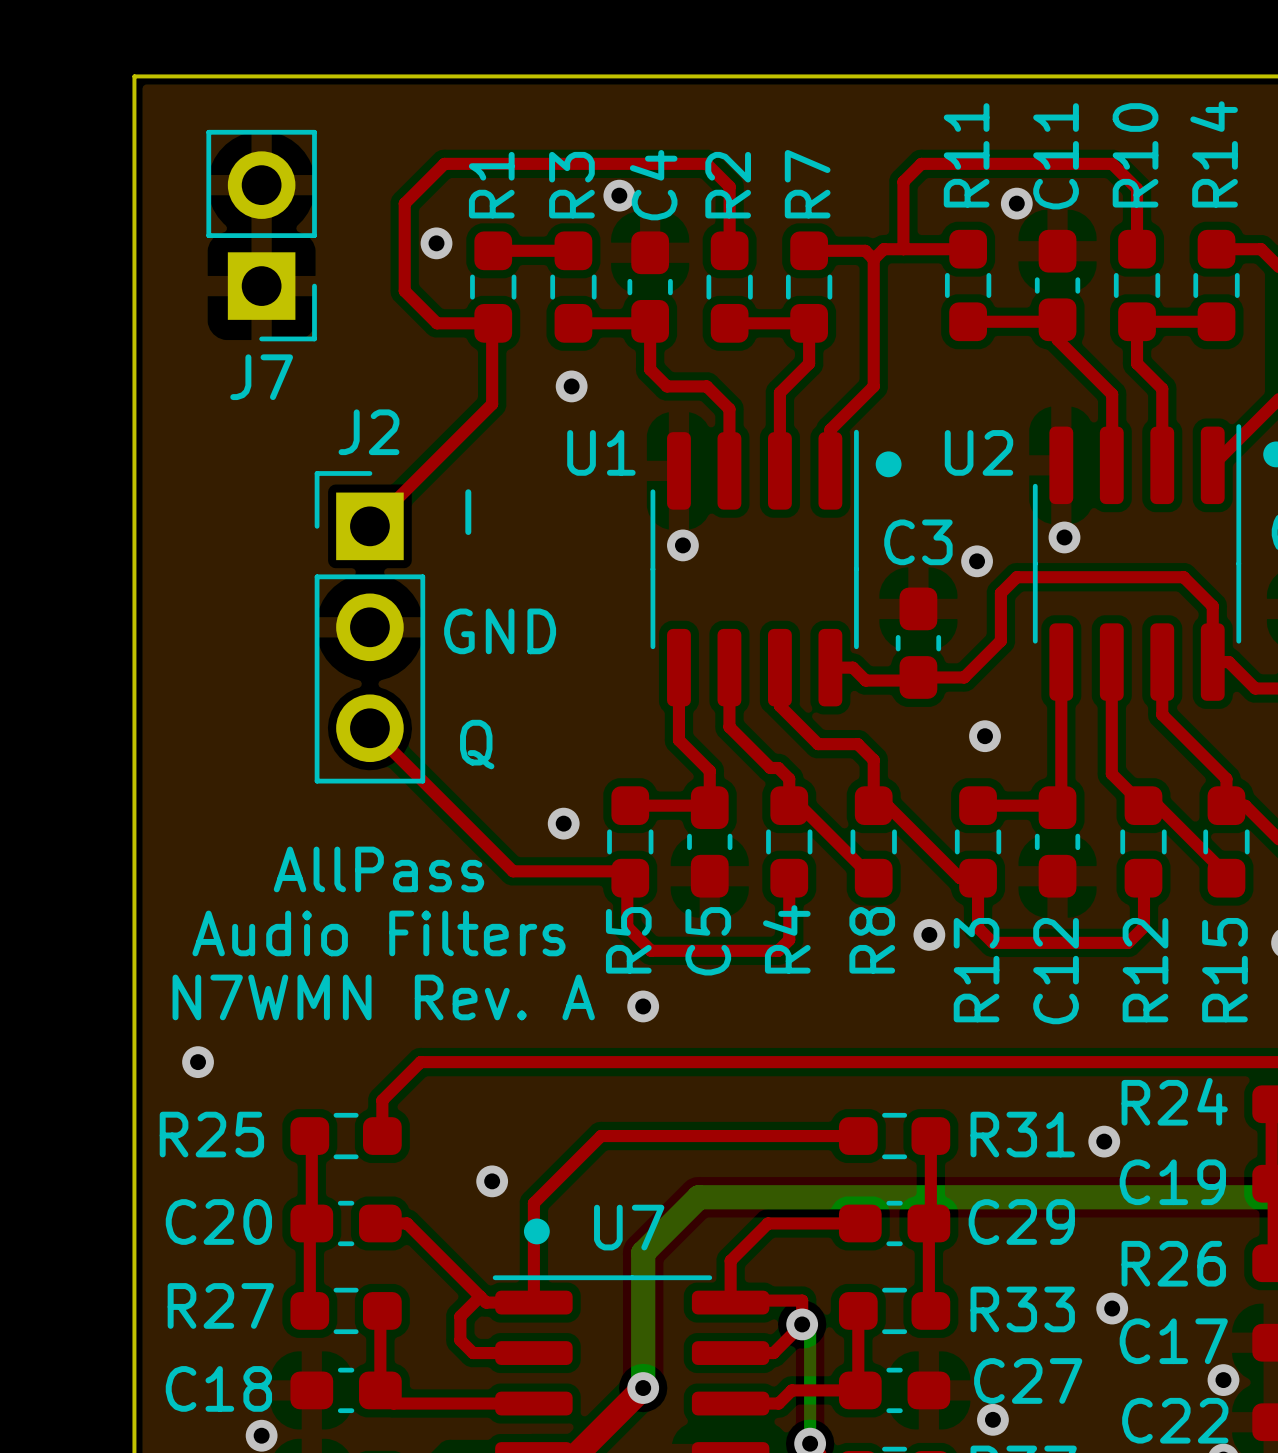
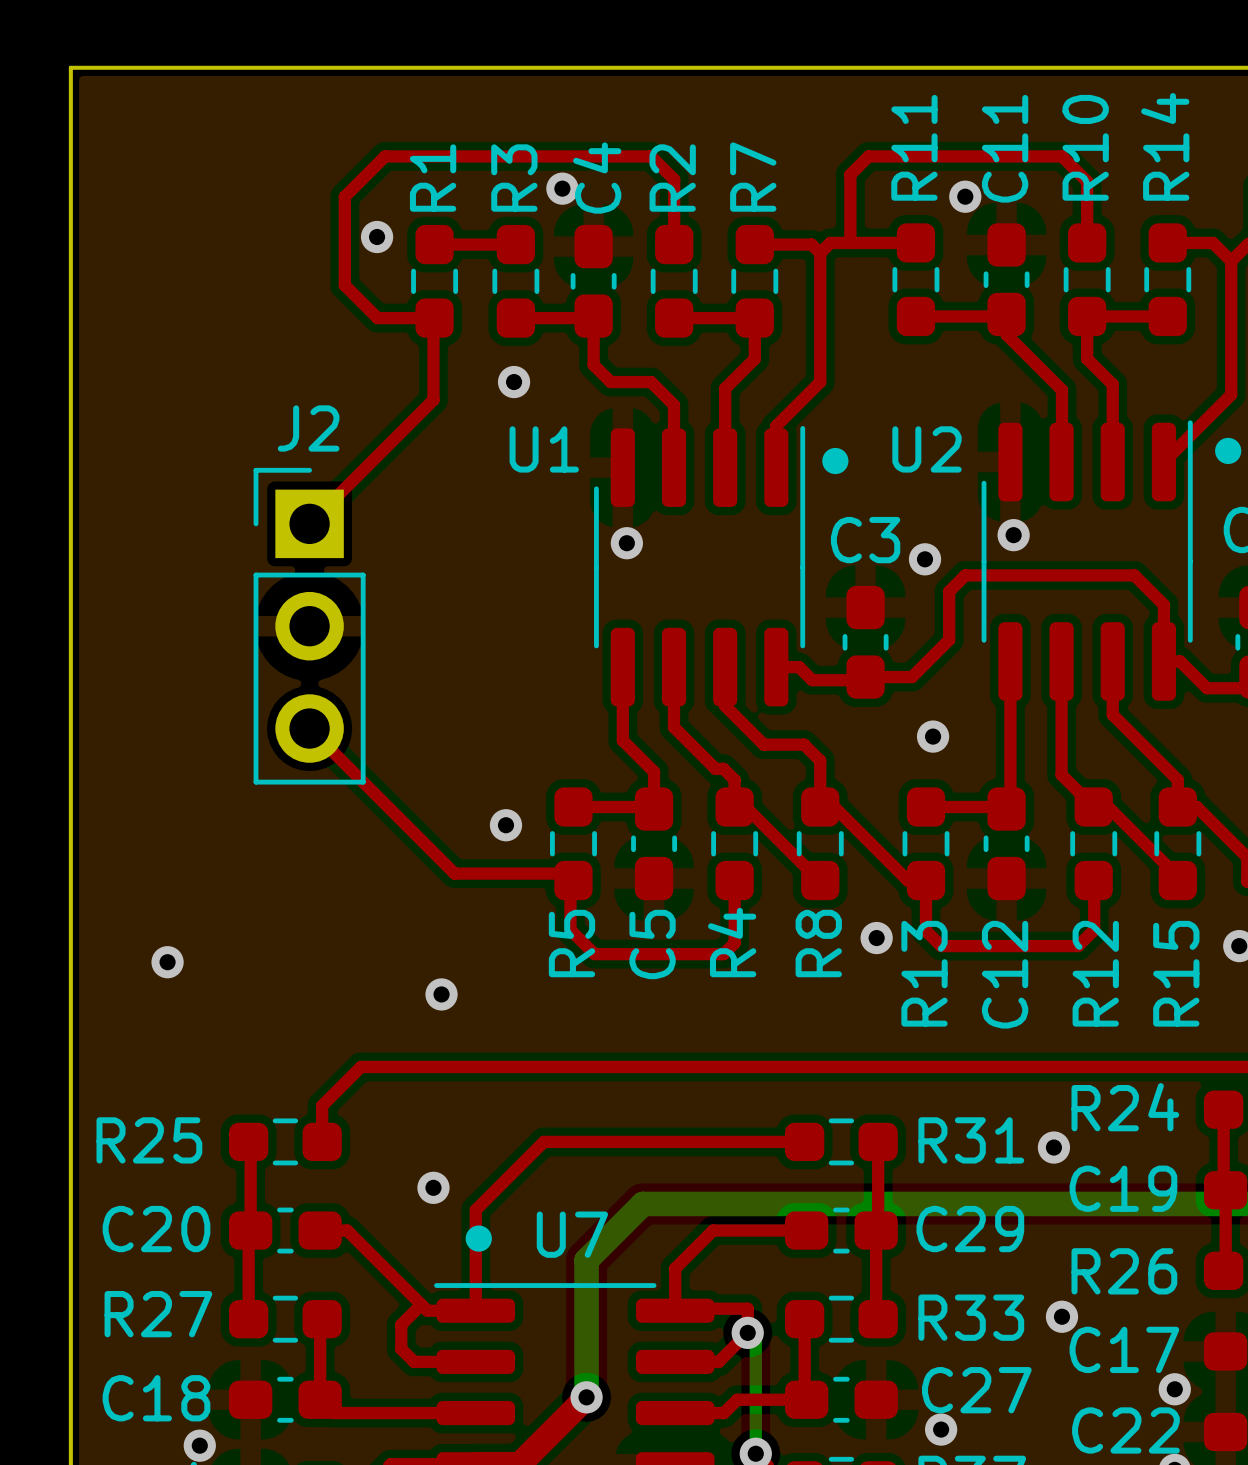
J7: (261, 235) -> none
text: I (468, 512) -> none
text: GND (500, 631) -> none
text: Q (477, 744) -> none
text: AllPass (378, 869) -> none
text: Audio Filters (378, 933) -> none
text: N7WMN Rev. A (383, 997) -> none
via position: (643, 1006) -> (441, 994)
via position: (198, 1062) -> (167, 962)

